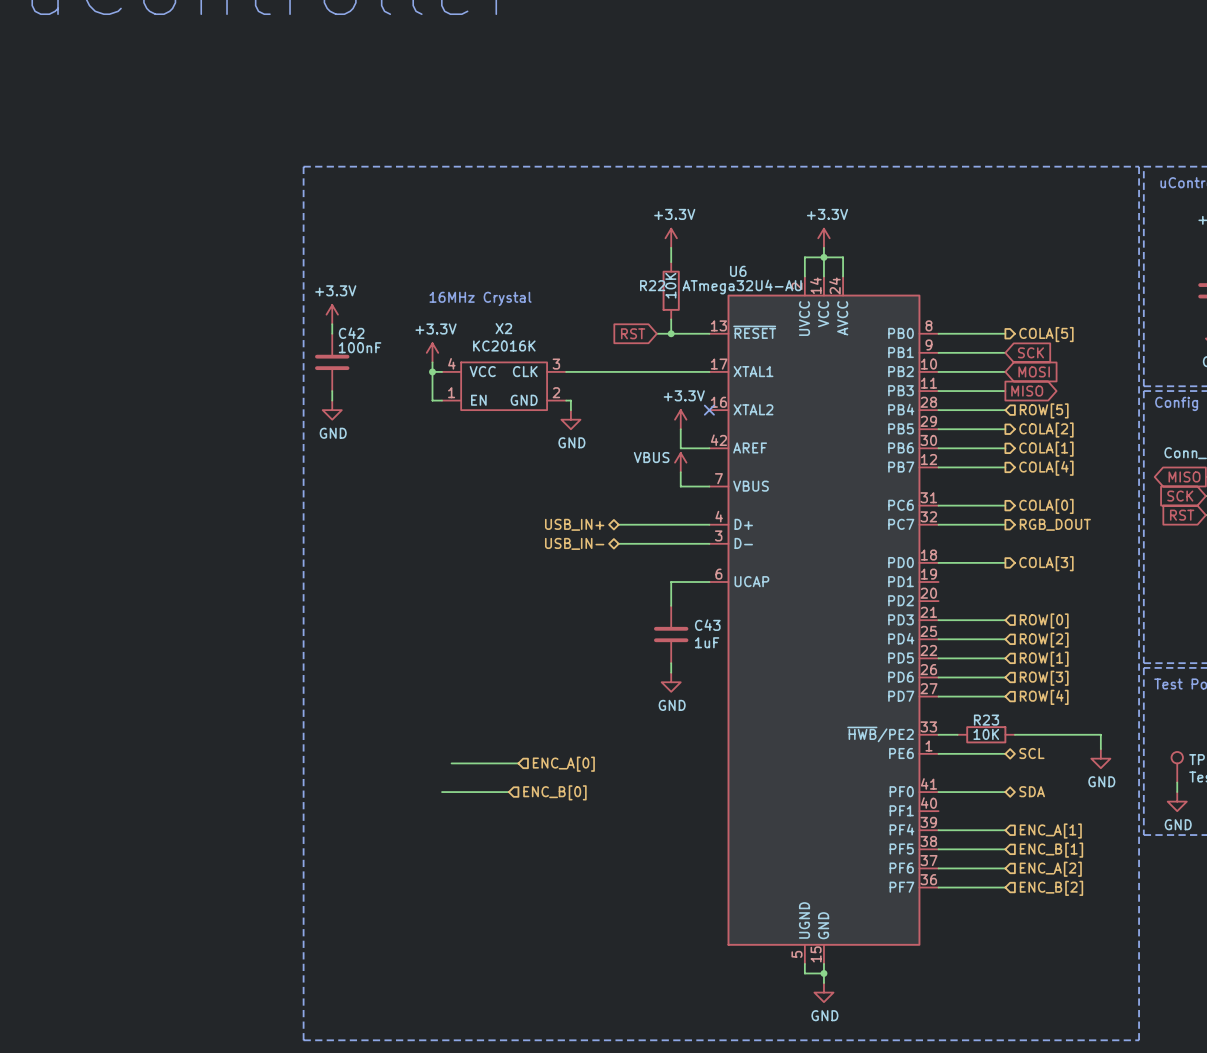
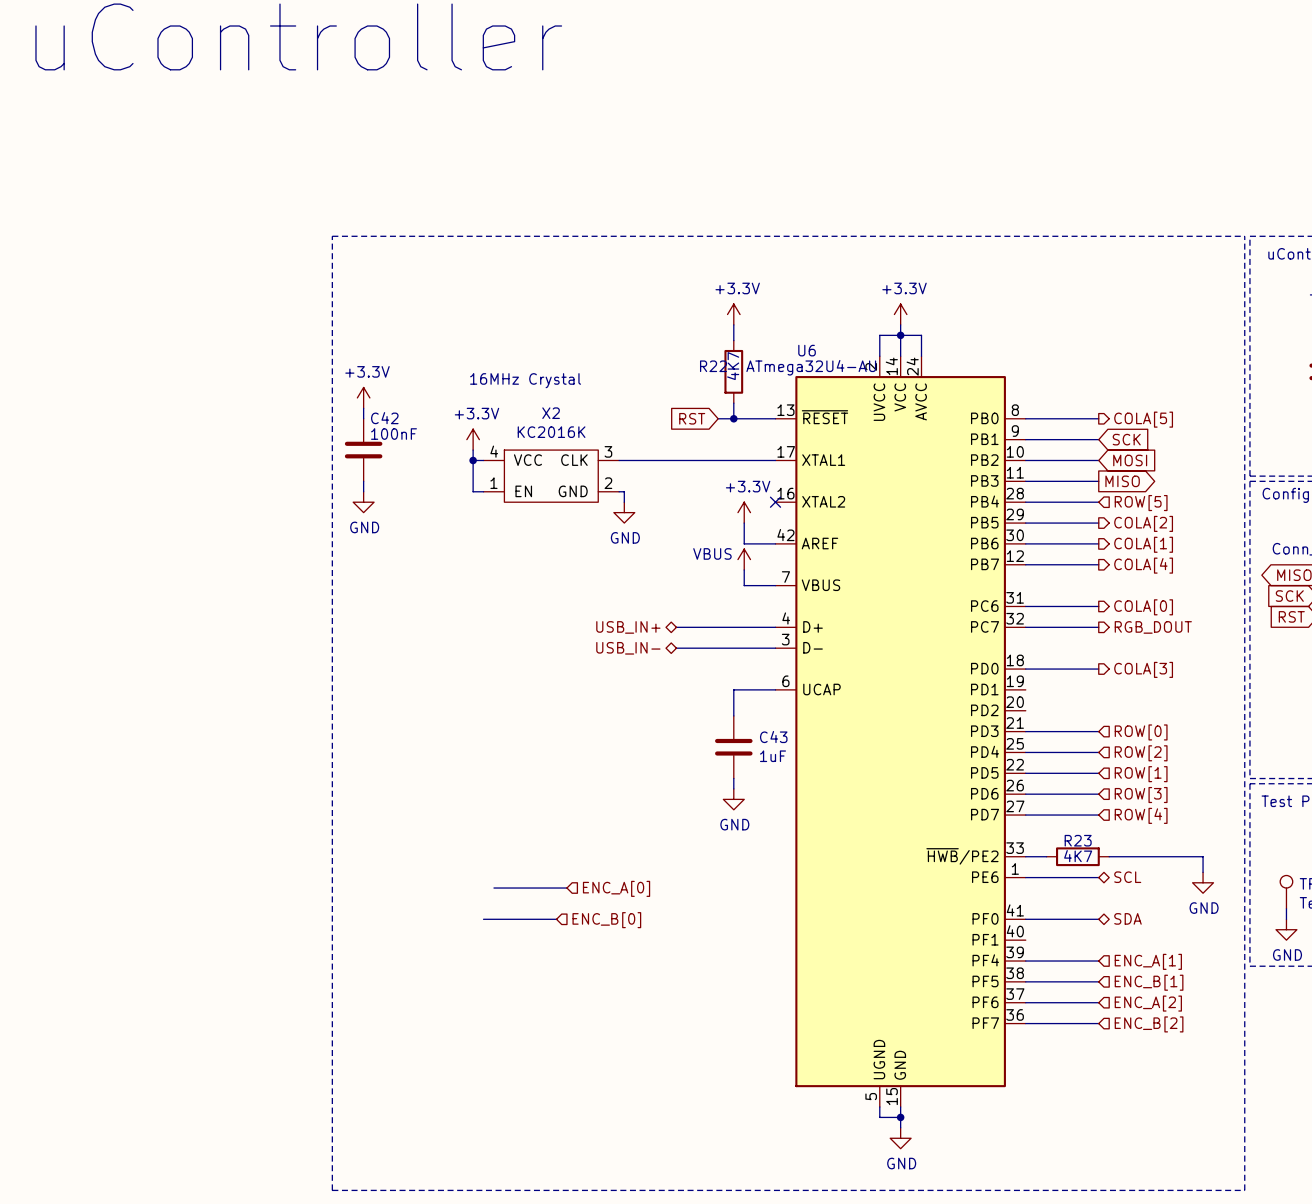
R22 value: 10K (670, 285) -> 4K7 (733, 366)
R23 value: 10K (986, 734) -> 4K7 (1078, 856)

